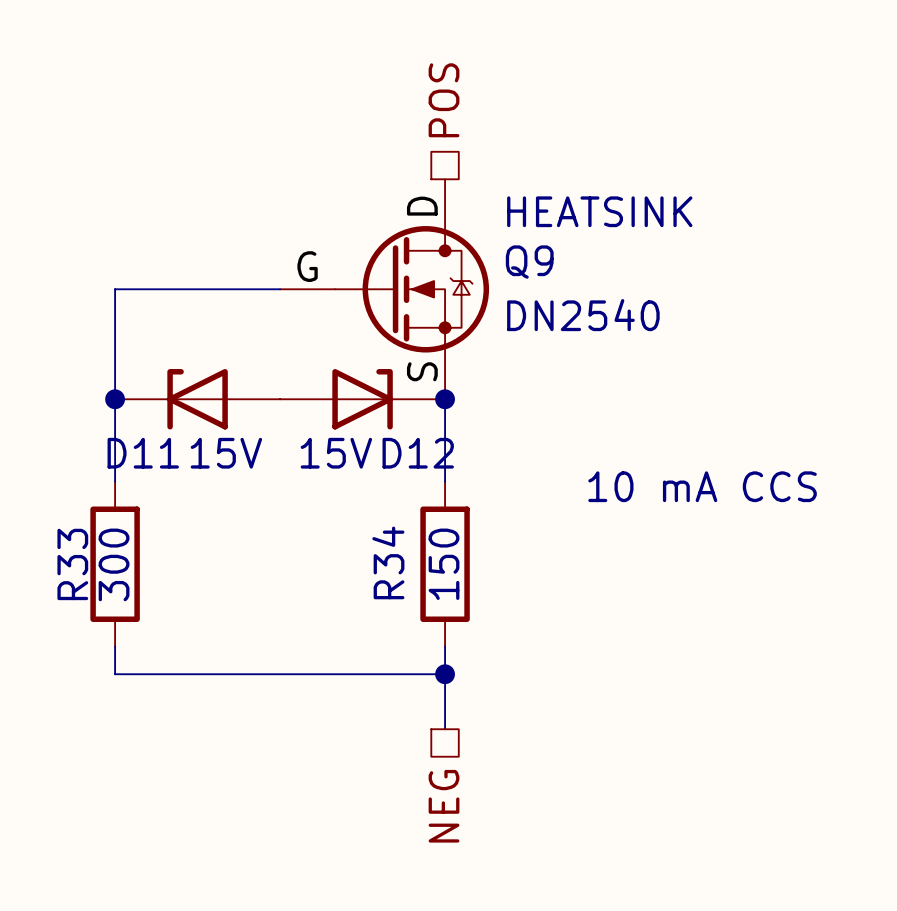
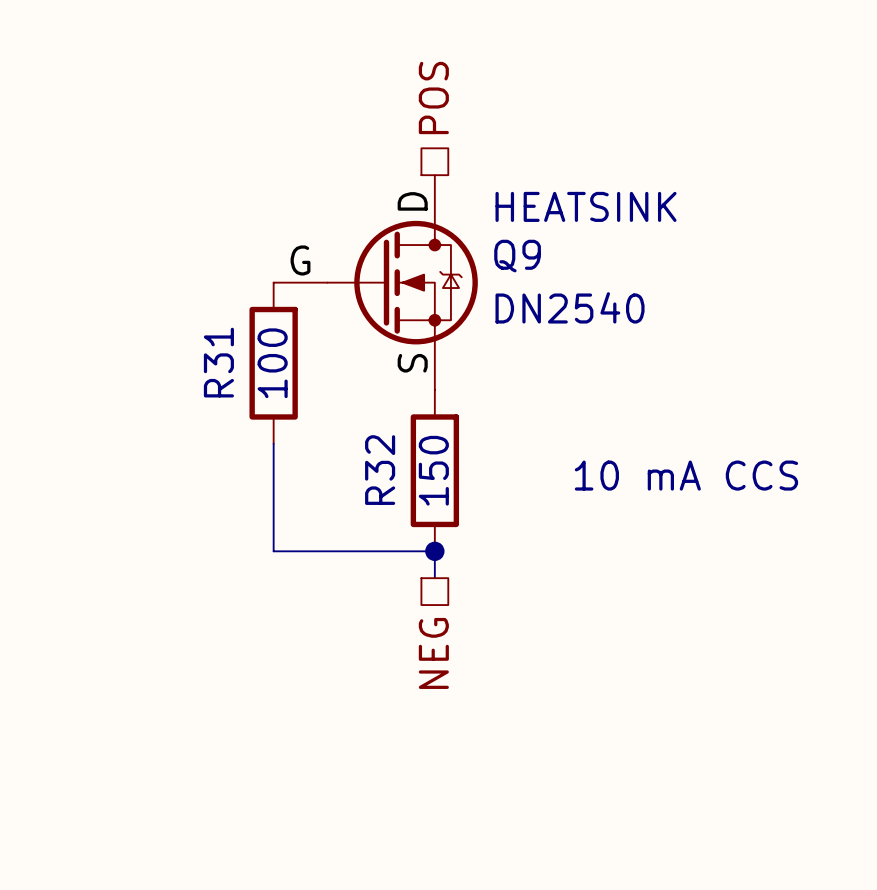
wire: (280, 289) (115, 289) (115, 481) -> none
R31: none -> 100 (273, 363)
junction: (115, 399) -> none
D11: 15V (197, 399) -> none
D12: 15V (362, 399) -> none
wire: (445, 399) (445, 481) -> none
junction: (445, 399) -> none
wire: none -> (273, 443) (273, 551) (434, 551) (434, 578)
R32: none -> 150 (434, 470)
R33: 300 (115, 564) -> none
junction: none -> (434, 551)
R34: 150 (445, 564) -> none
wire: (115, 646) (115, 674) (445, 674) -> none
wire: (445, 646) (445, 729) -> none
junction: (445, 674) -> none
hierarchical label position: NEG (444, 806) -> NEG (433, 653)

